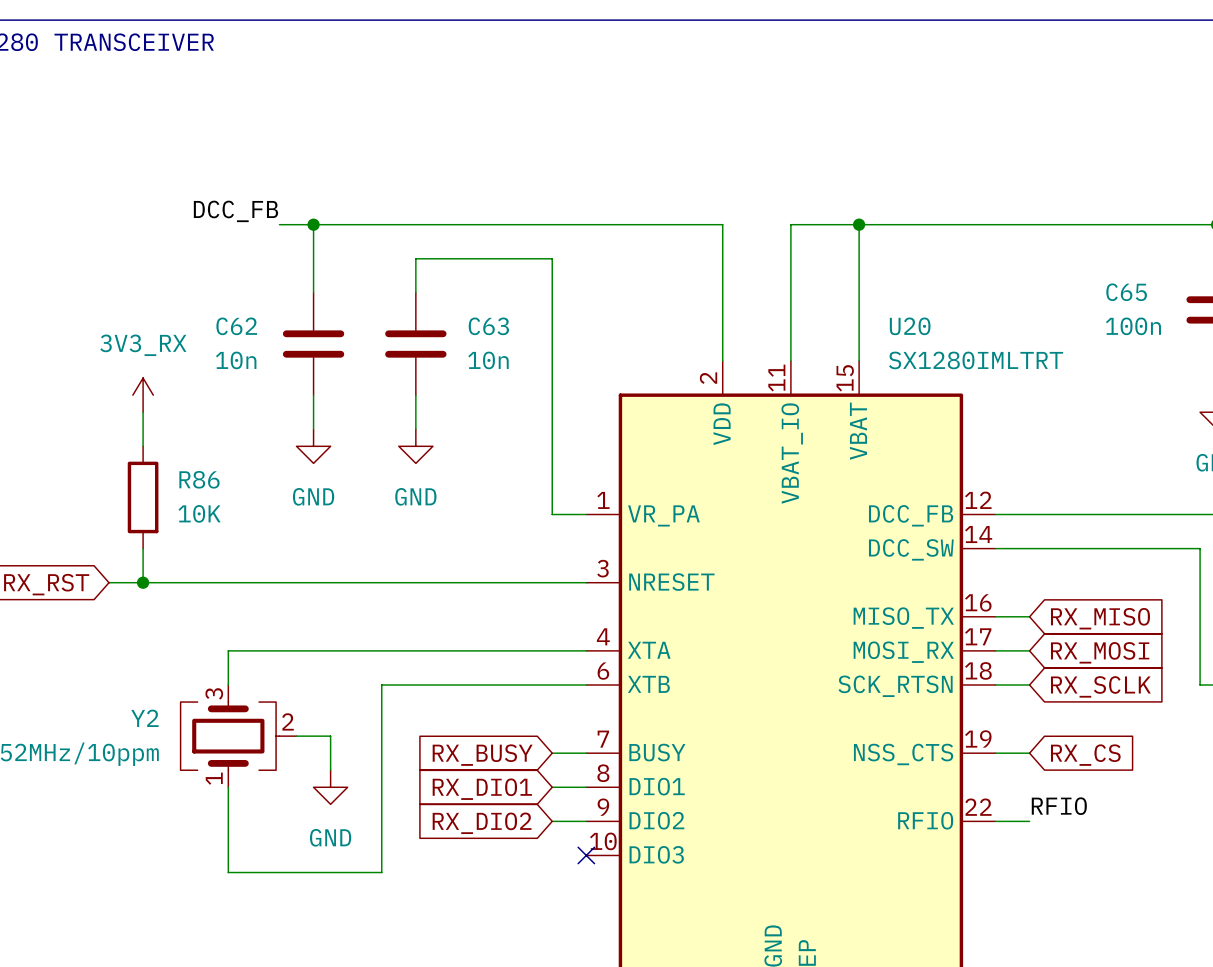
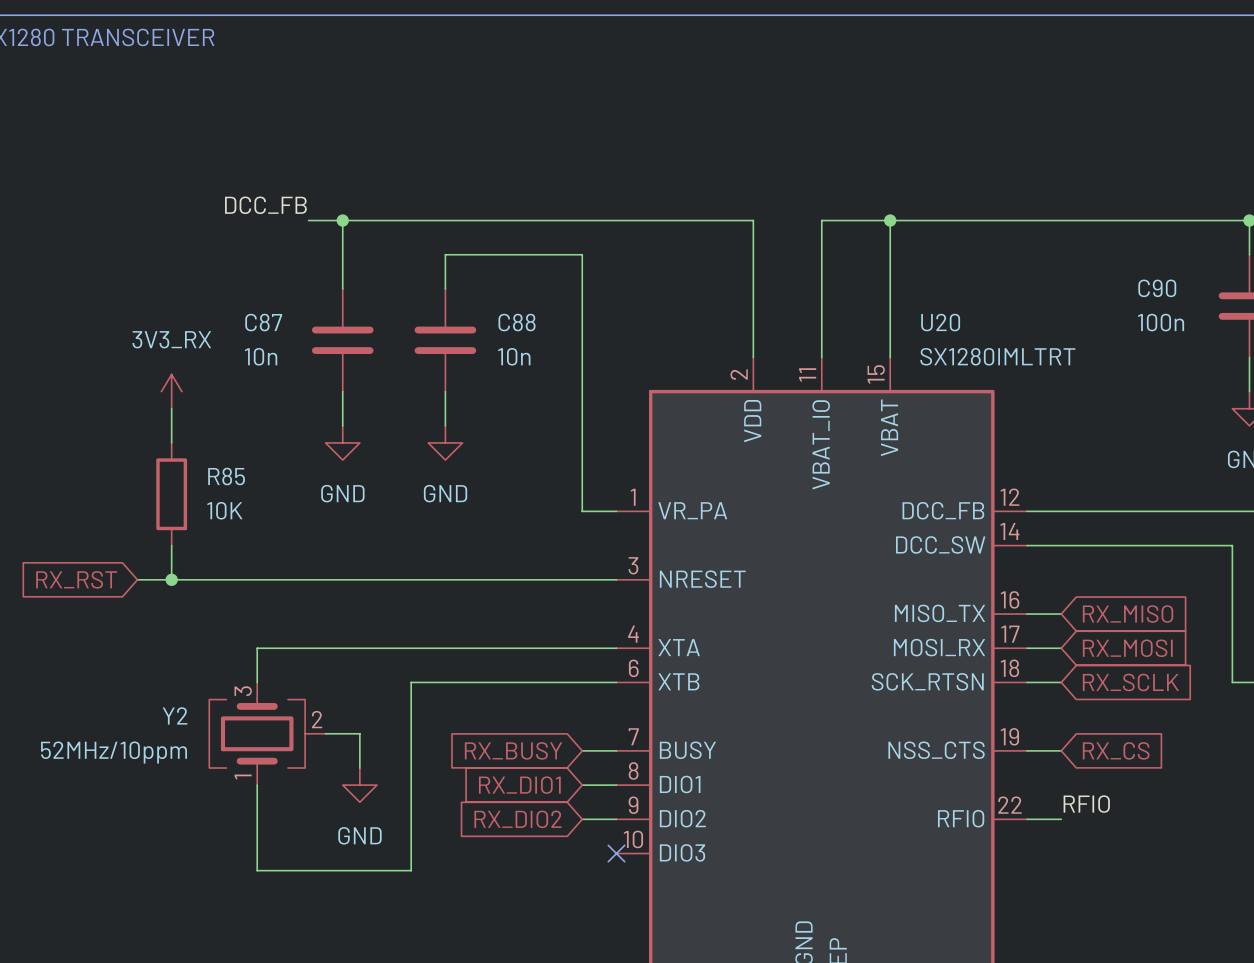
C65 name: C65 (1126, 292) -> C90 (1157, 288)
C62 name: C62 (236, 326) -> C87 (263, 322)
C63 name: C63 (488, 326) -> C88 (517, 322)
R86 name: R86 (199, 479) -> R85 (226, 476)

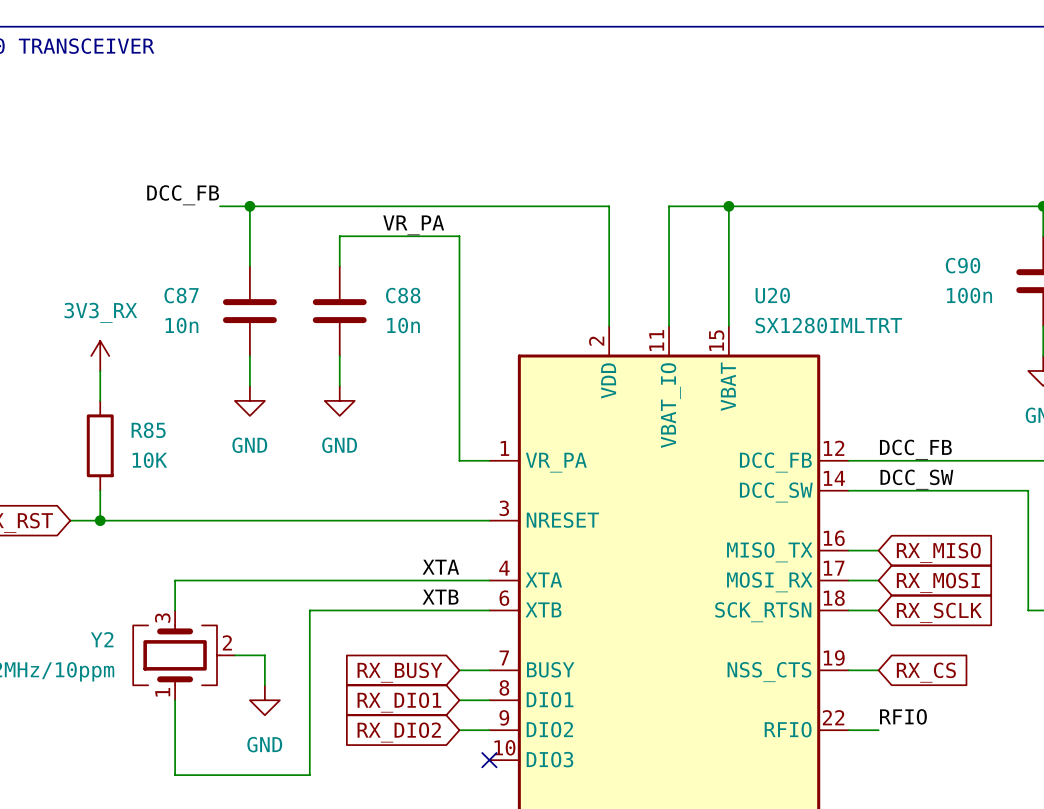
label: none -> VR_PA (413, 225)
label: none -> DCC_FB (915, 449)
label: none -> DCC_SW (916, 479)
label: none -> XTA (440, 567)
label: none -> XTB (440, 597)

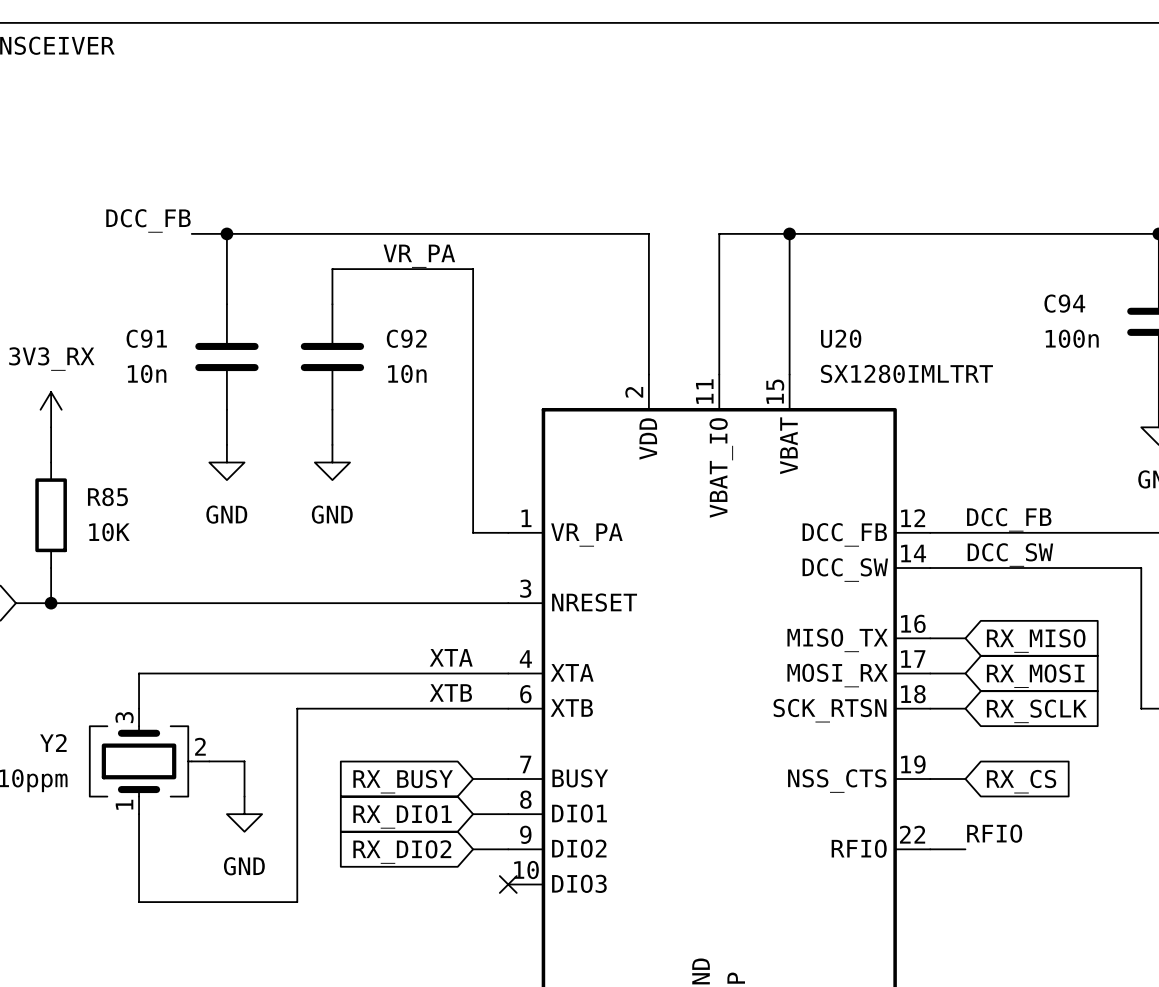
C90 name: C90 (963, 265) -> C94 (1064, 303)
C87 name: C87 (181, 295) -> C91 (146, 338)
C88 name: C88 (403, 295) -> C92 (406, 338)

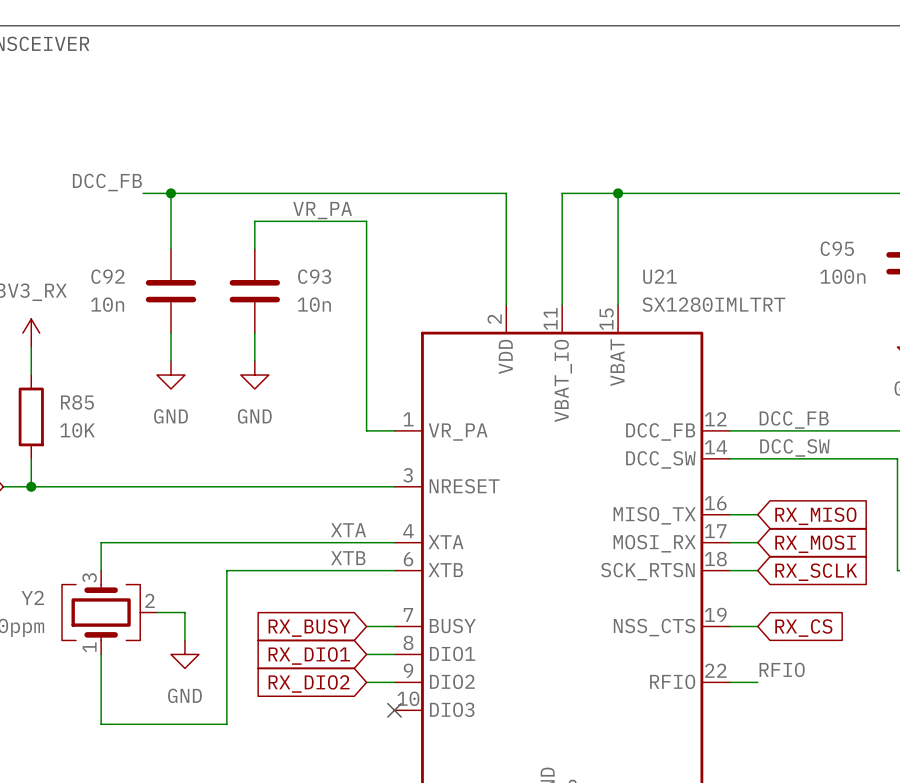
C94 name: C94 (1064, 303) -> C95 (837, 248)
C91 name: C91 (146, 338) -> C92 (108, 276)
C92 name: C92 (406, 338) -> C93 (314, 276)
U20 name: U20 (841, 338) -> U21 (659, 276)

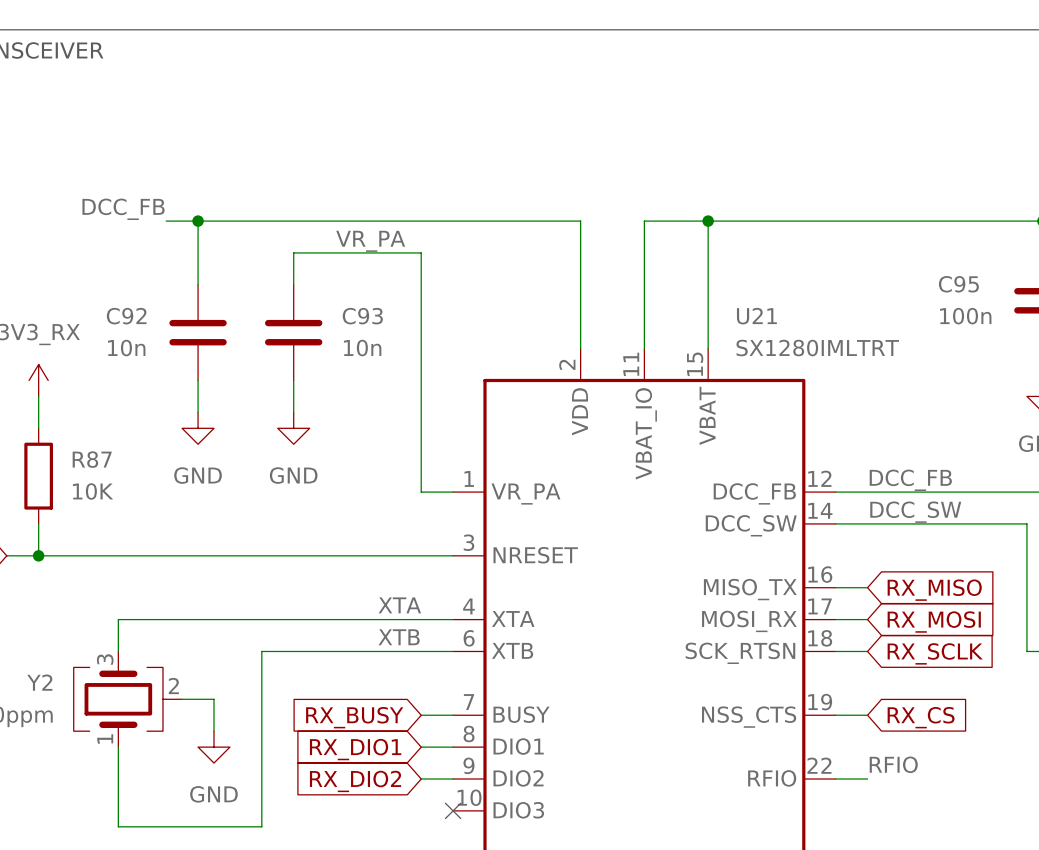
R85 name: R85 (77, 402) -> R87 (92, 459)

